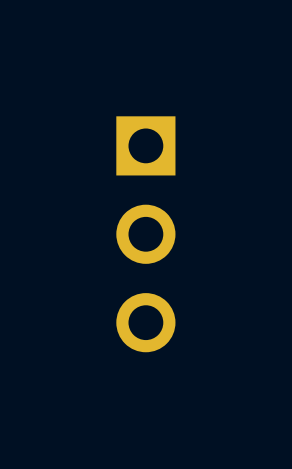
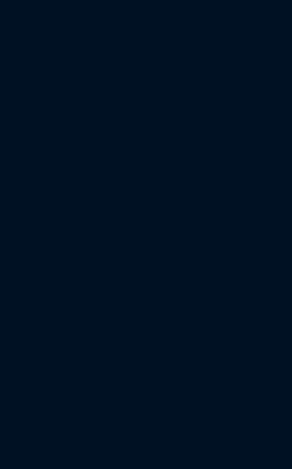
part: (145, 234) -> none

